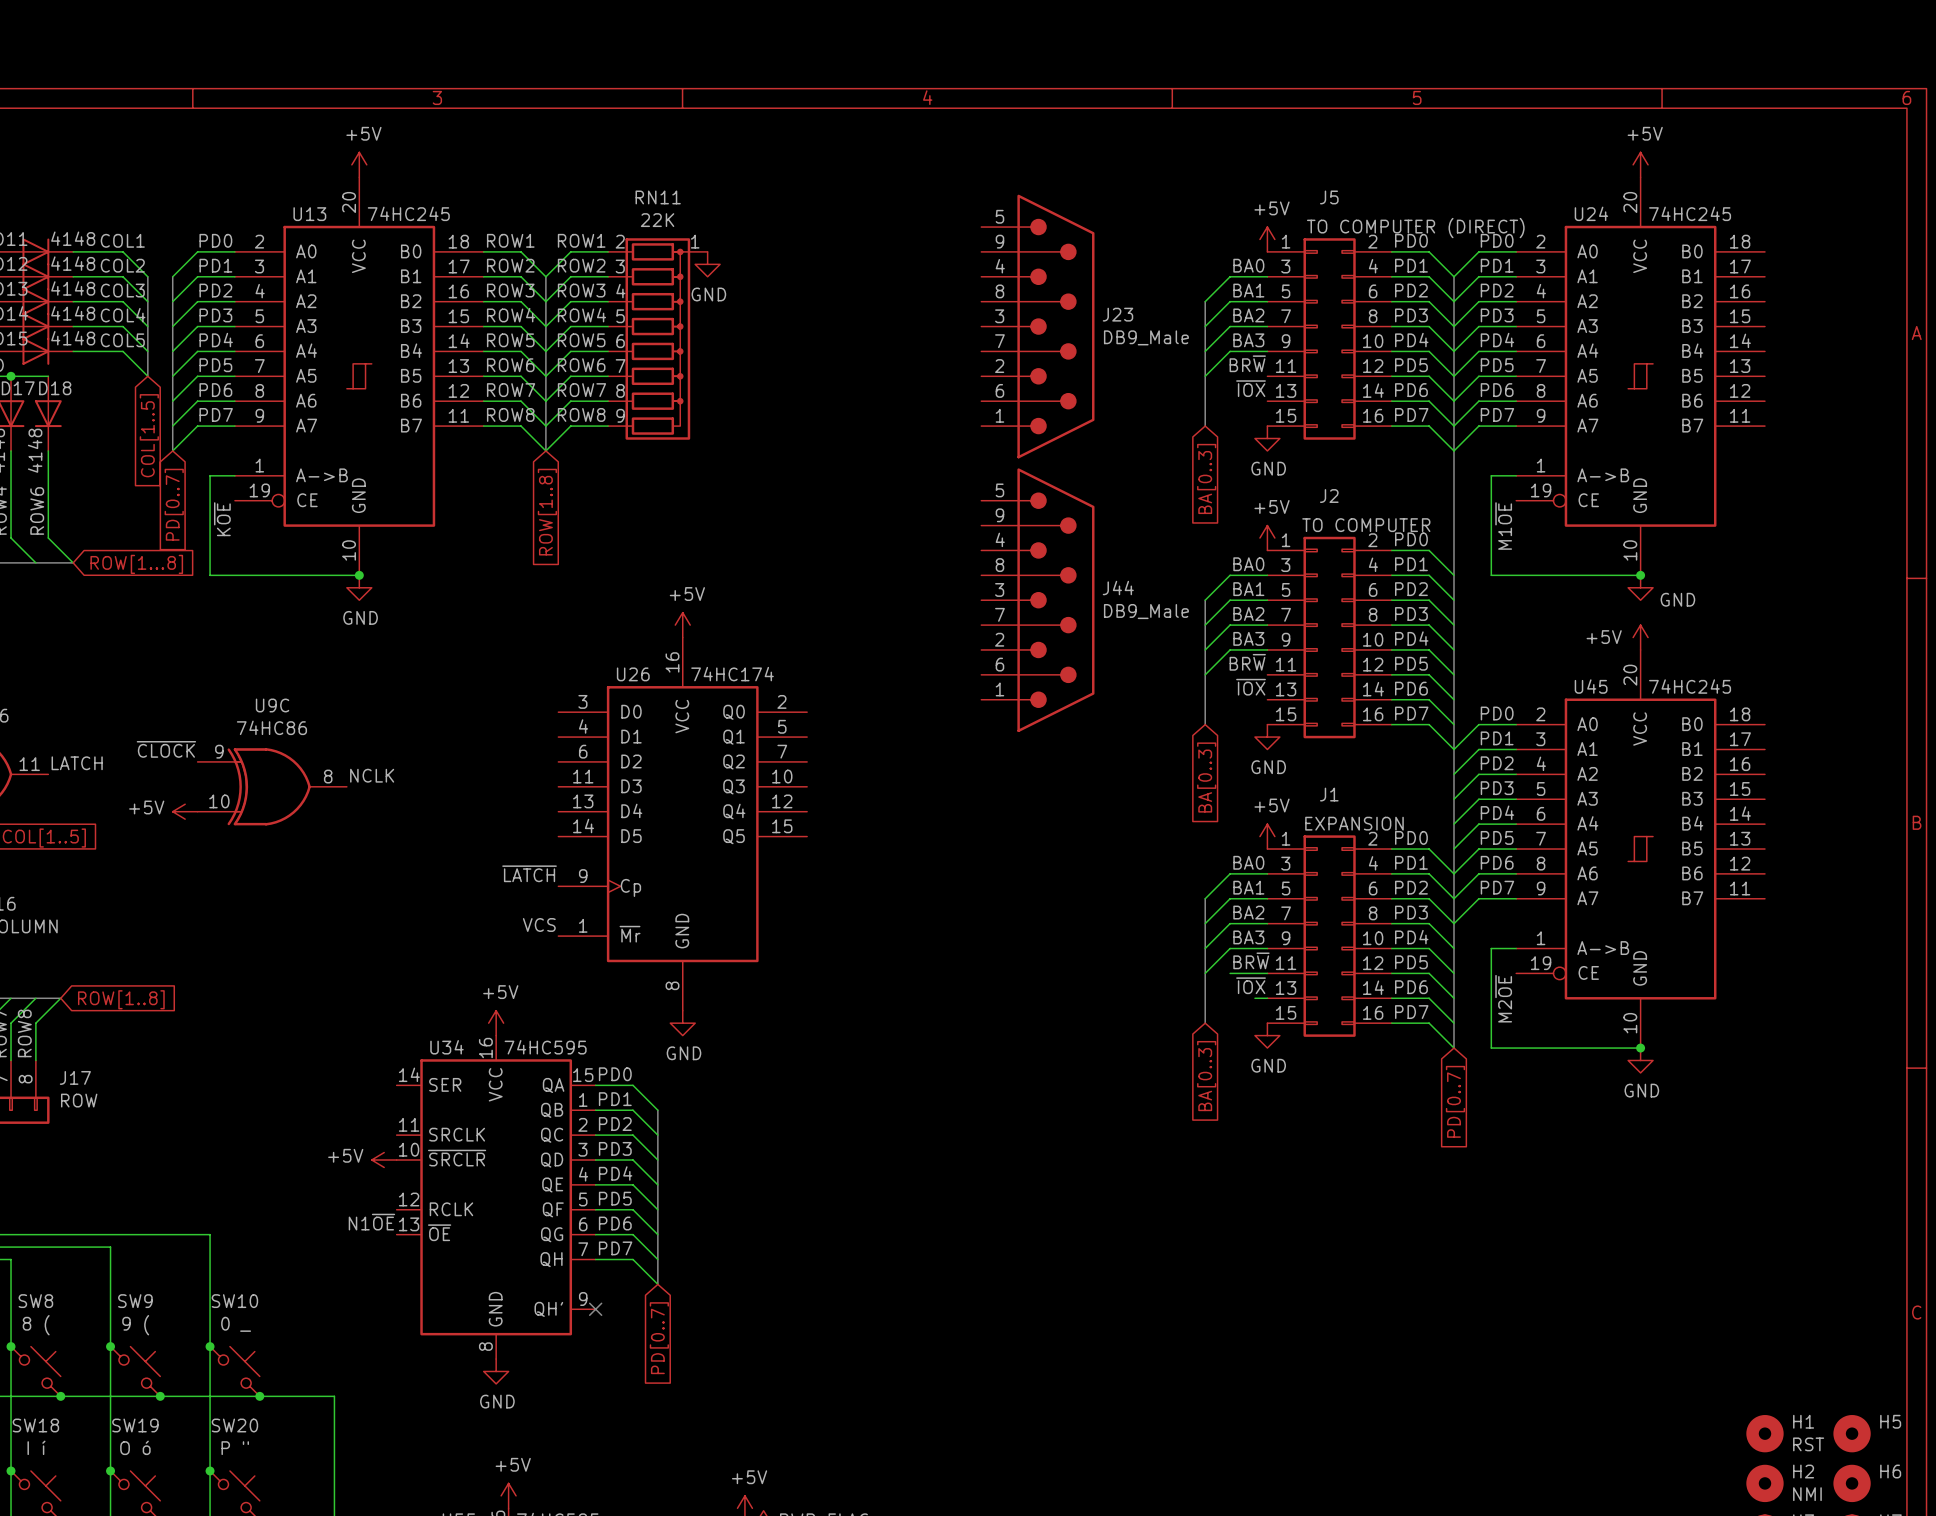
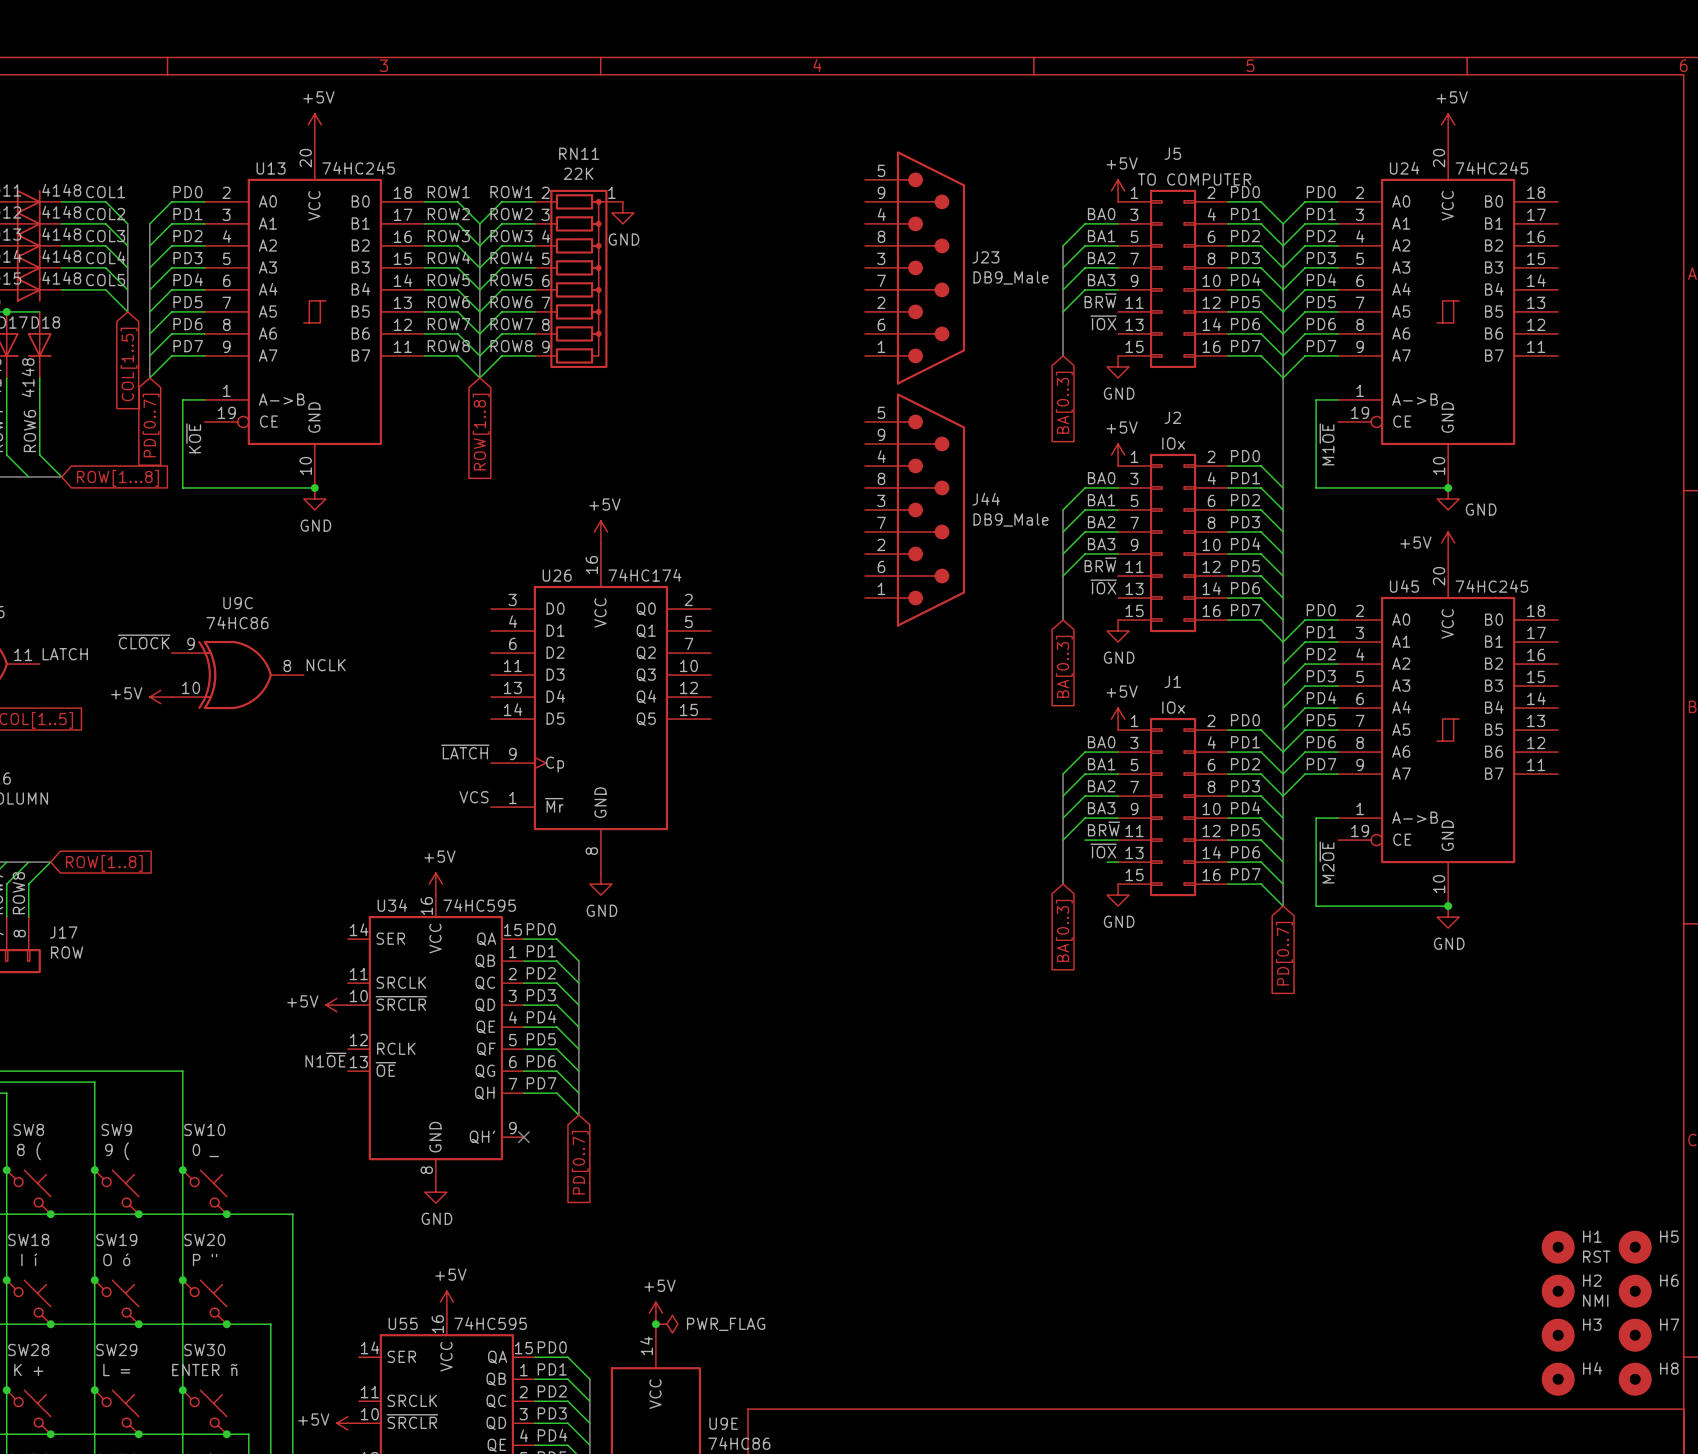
J5 value: TO COMPUTER (DIRECT) (1415, 228) -> TO COMPUTER (1194, 179)
J2 value: TO COMPUTER (1366, 525) -> IOx (1173, 443)
J1 value: EXPANSION (1354, 823) -> IOx (1173, 707)

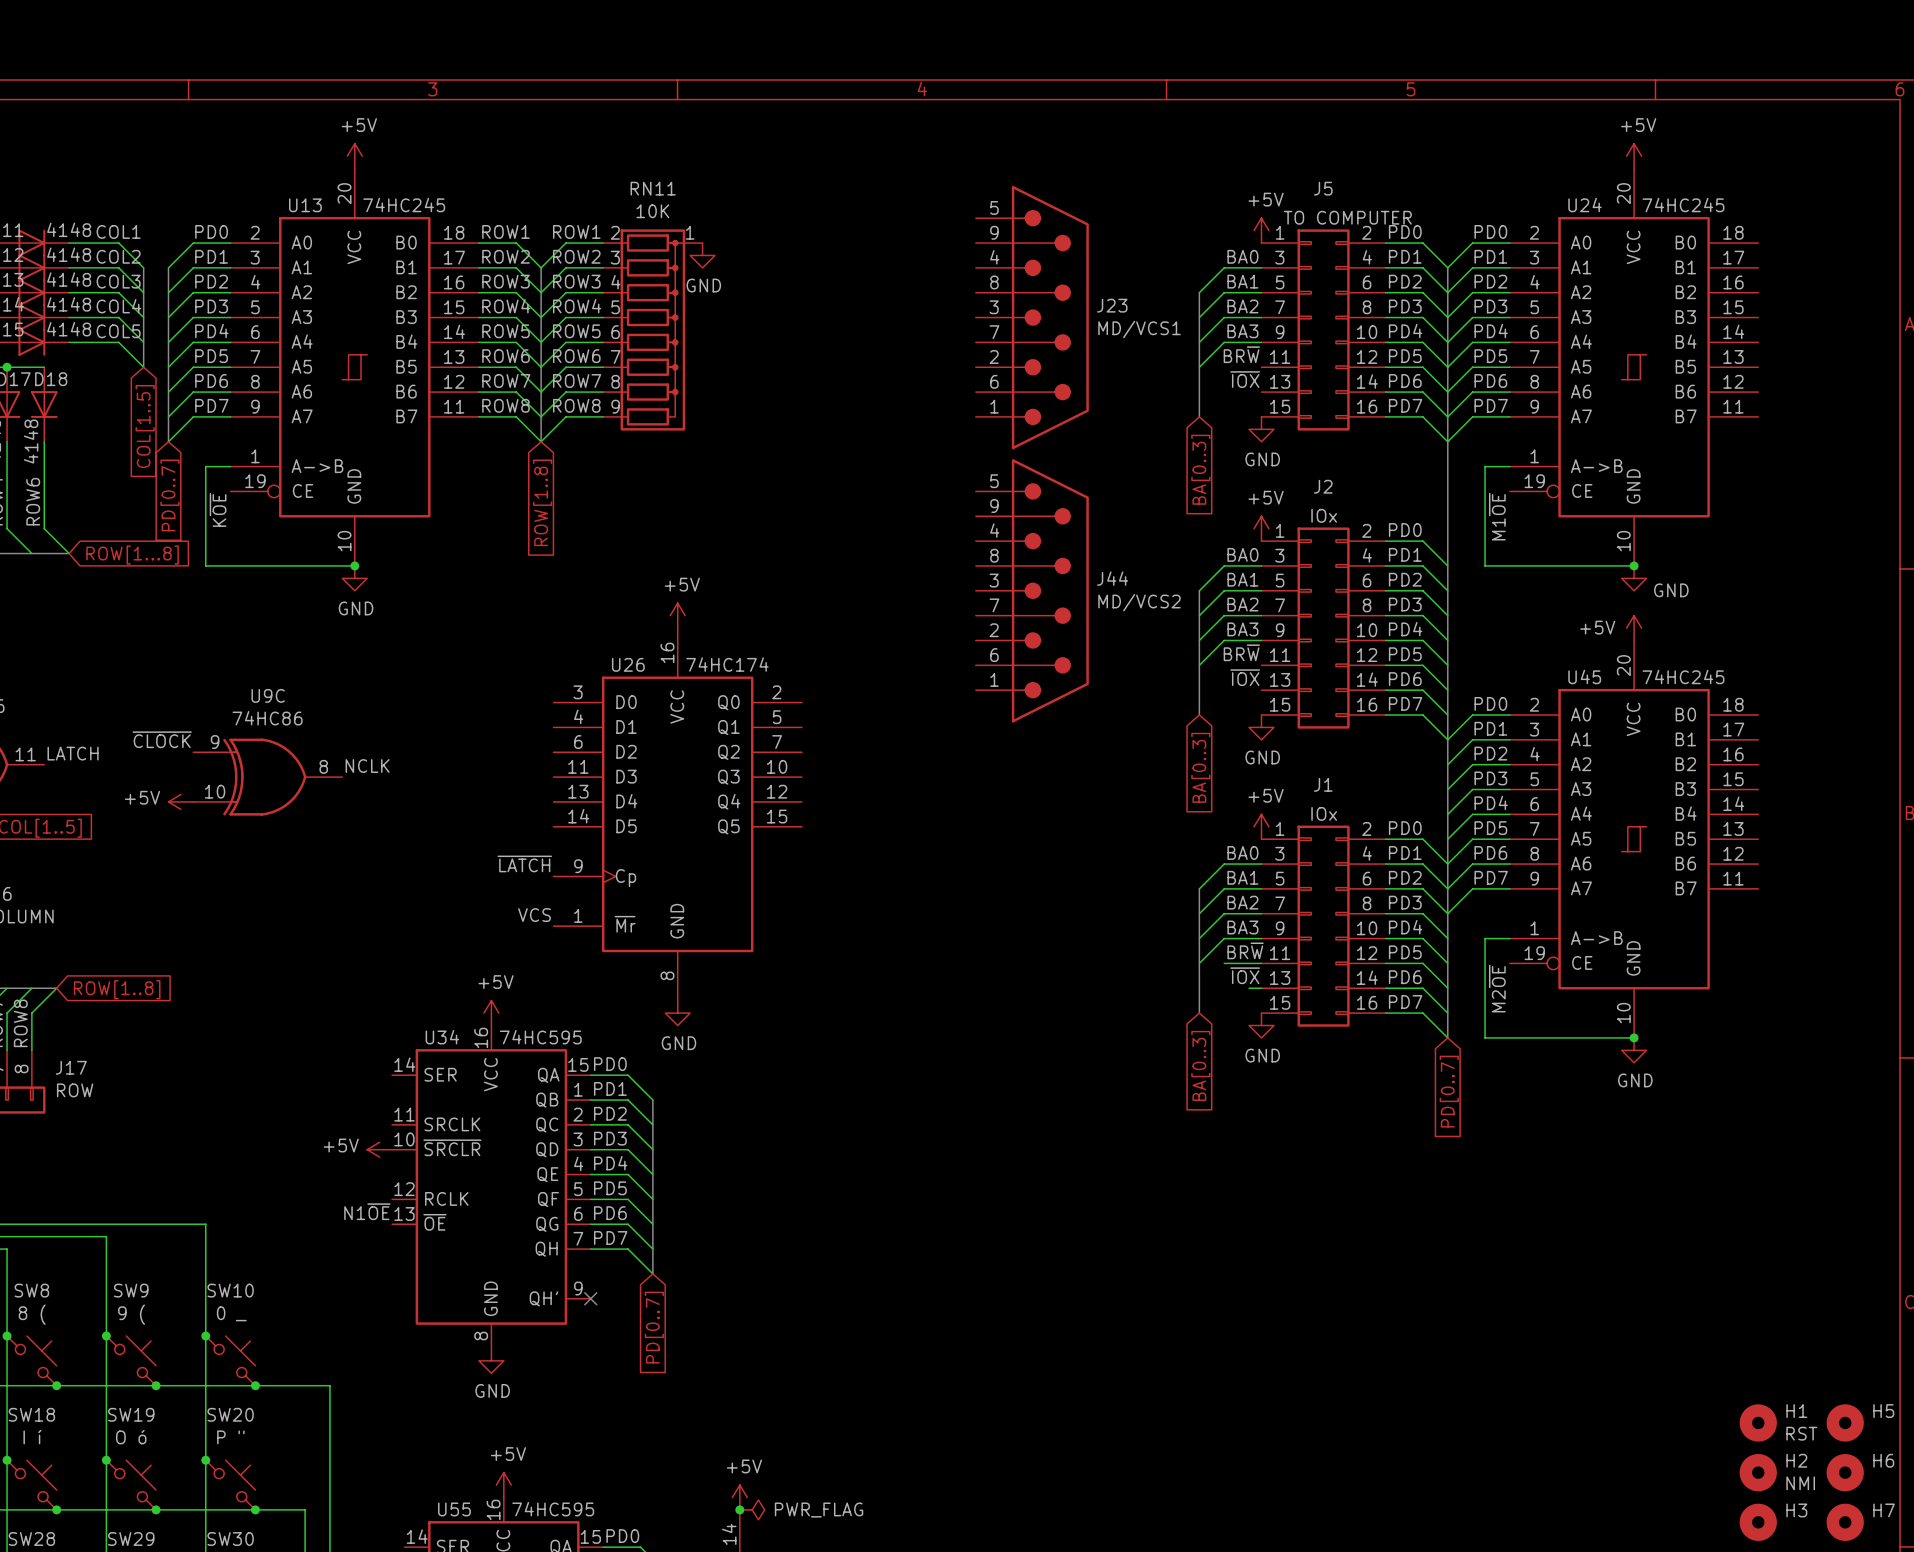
RN11 value: 22K (578, 173) -> 10K (652, 211)
J23 value: DB9_Male (1011, 277) -> MD/VCS1 (1139, 329)
J44 value: DB9_Male (1011, 520) -> MD/VCS2 (1139, 602)

